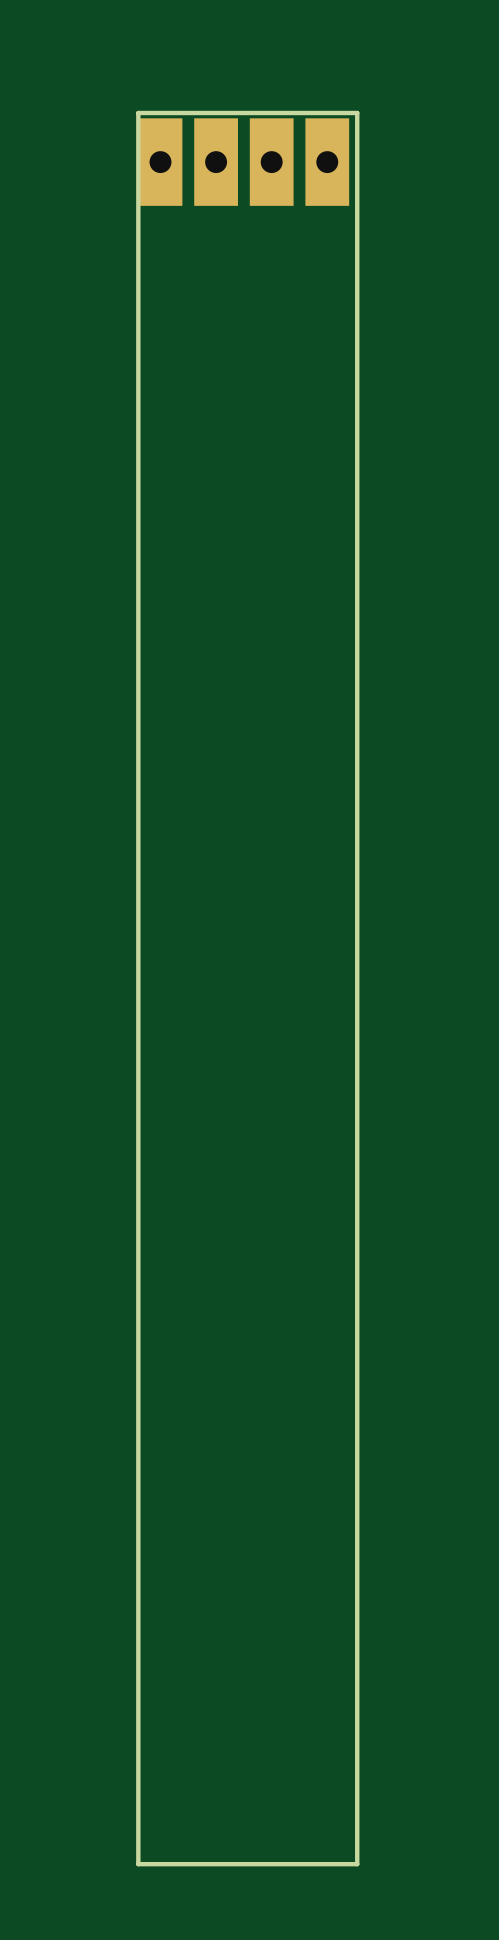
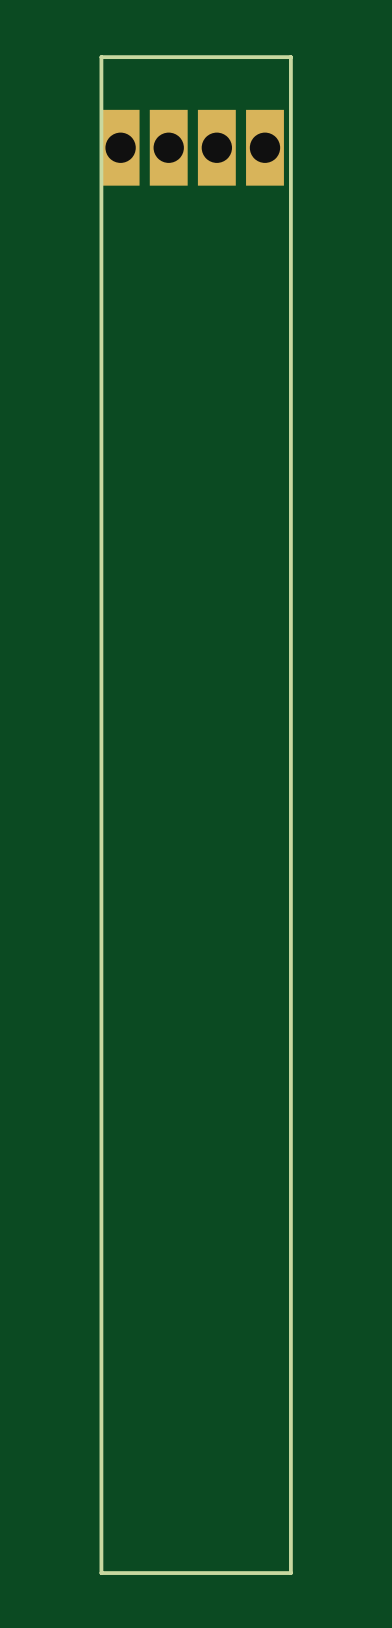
part: (160, 162) -> none
part: (216, 162) -> none
part: (271, 162) -> none
part: (327, 162) -> none
part: none -> (120, 147)
part: none -> (168, 147)
part: none -> (216, 147)
part: none -> (264, 147)

